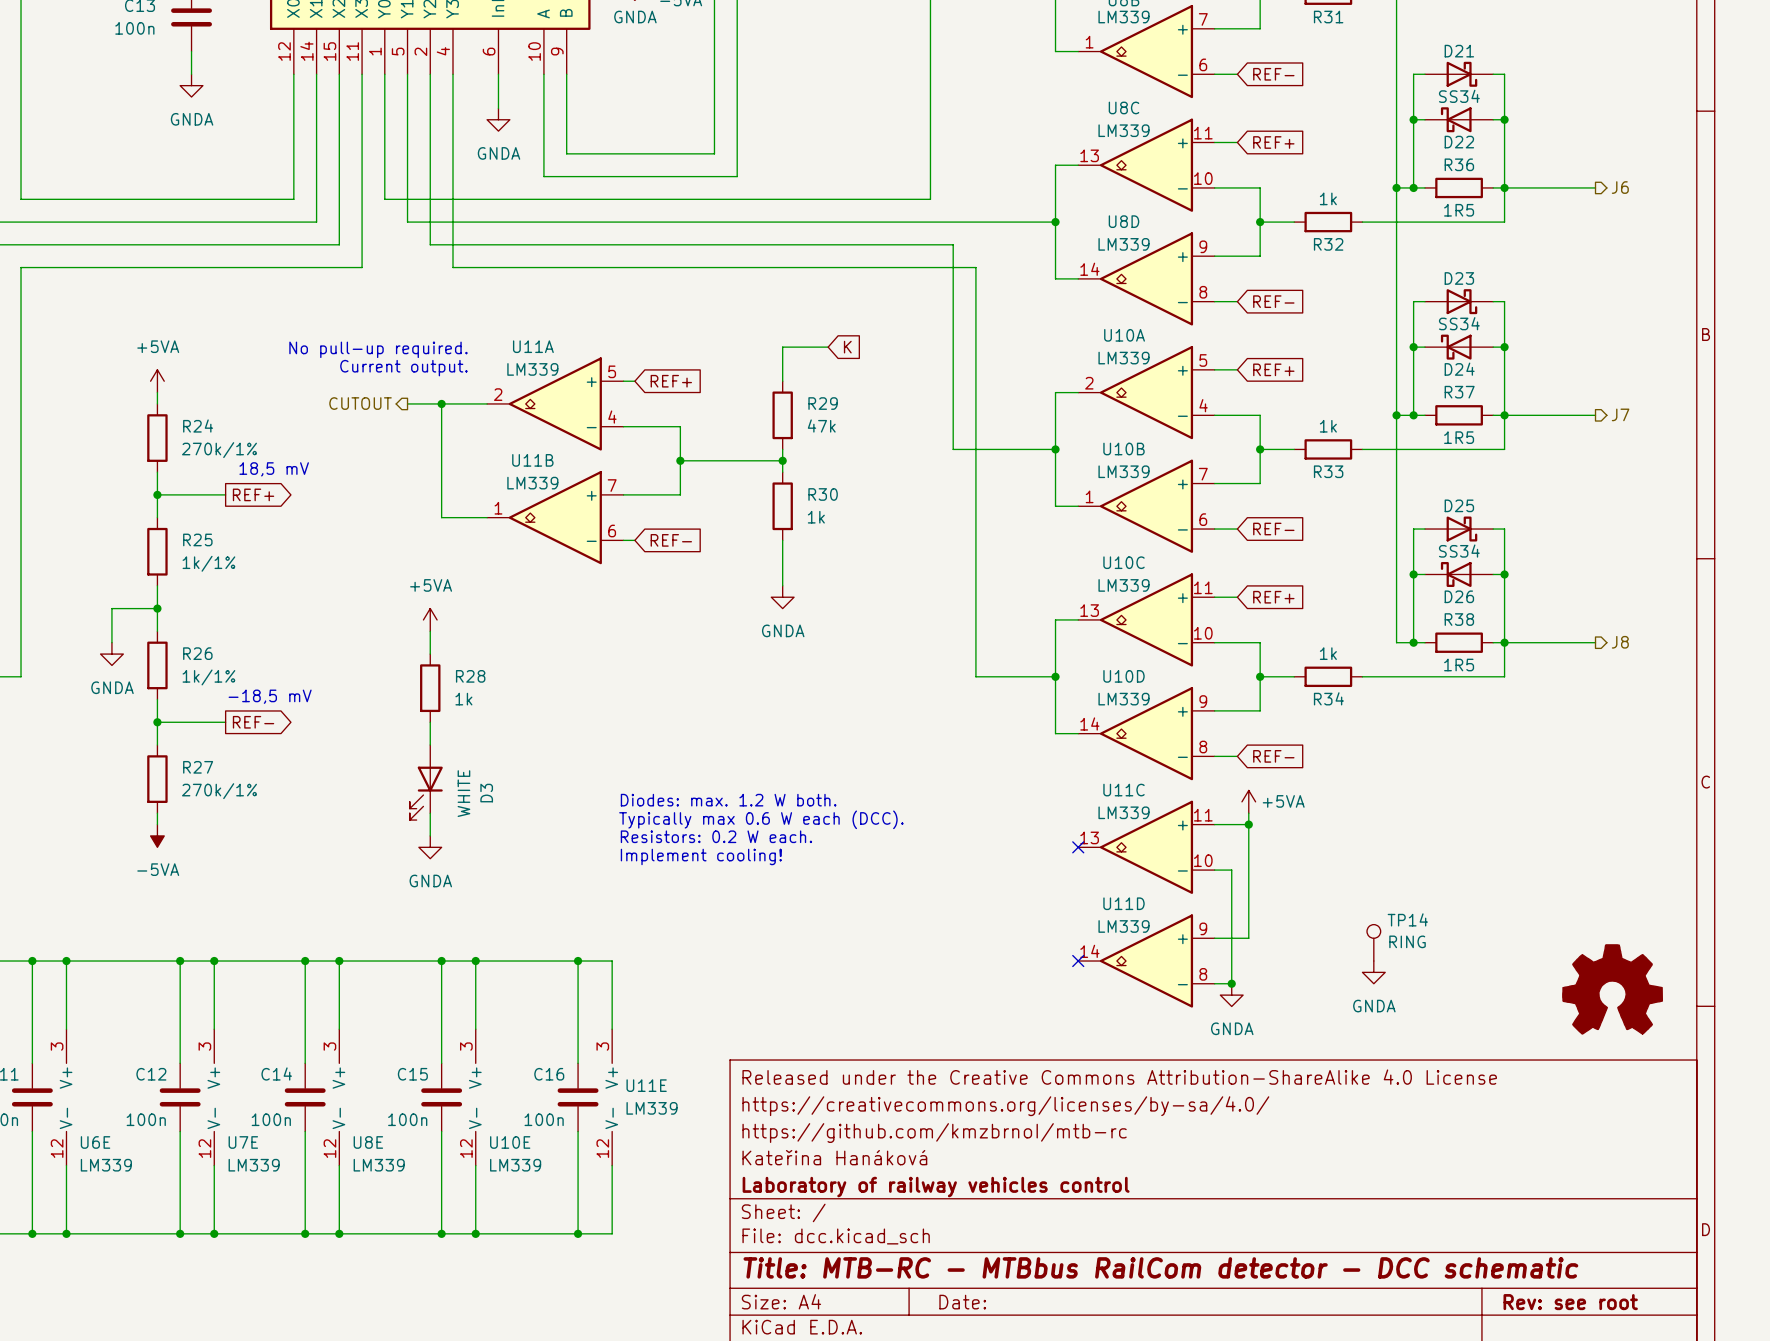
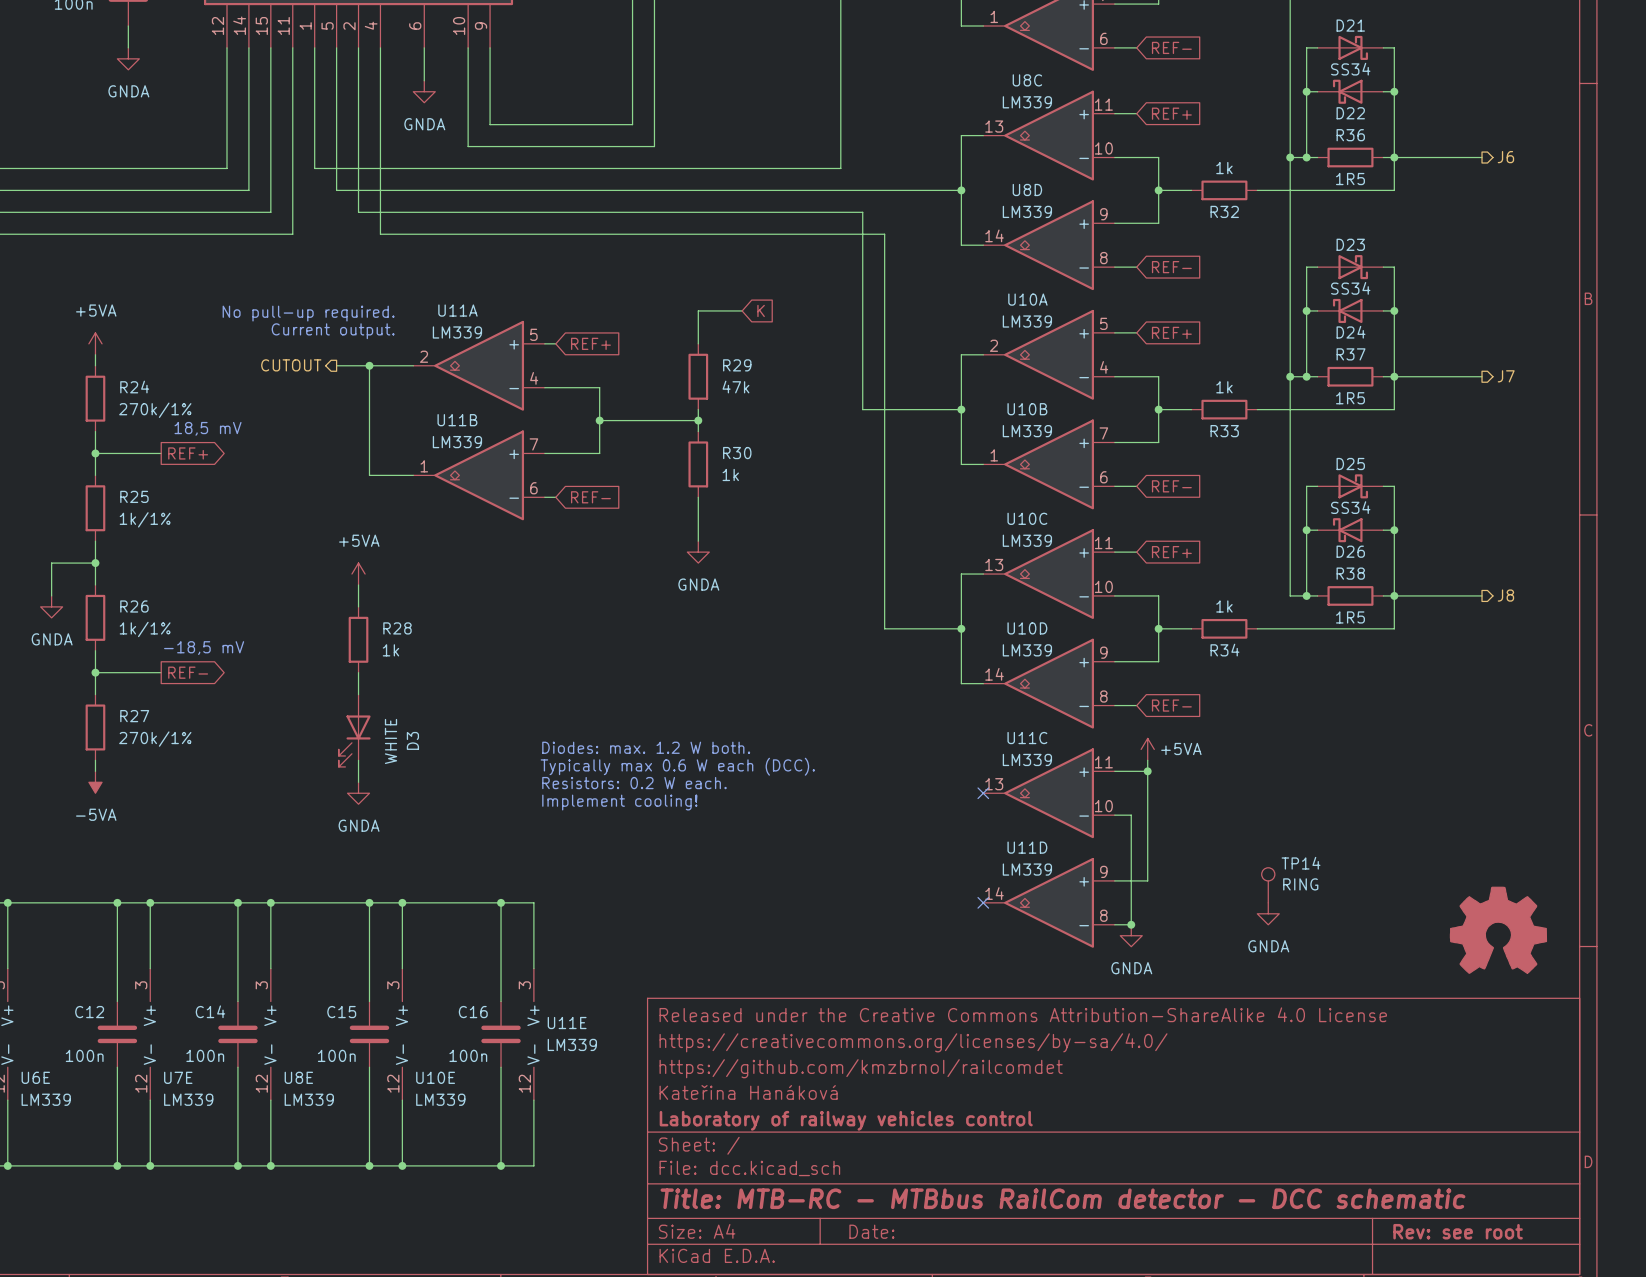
title block: https://github.com/kmzbrnoI/mtb-rc (934, 1133) -> https://github.com/kmzbrnoI/railcomdet (861, 1068)

